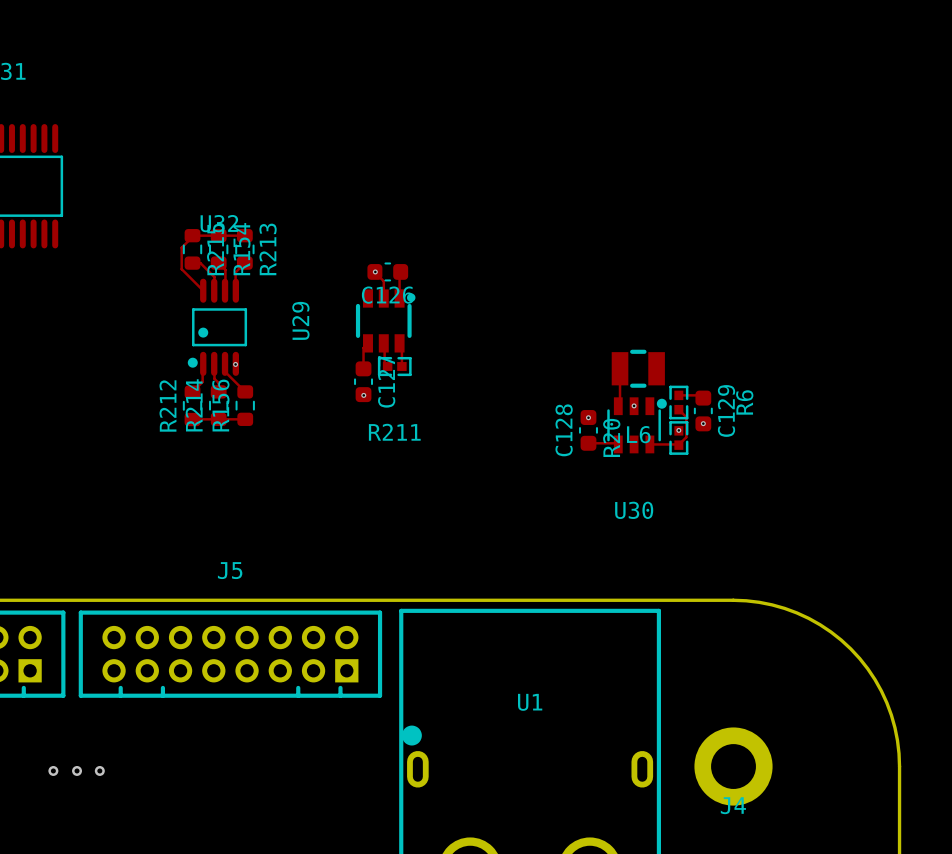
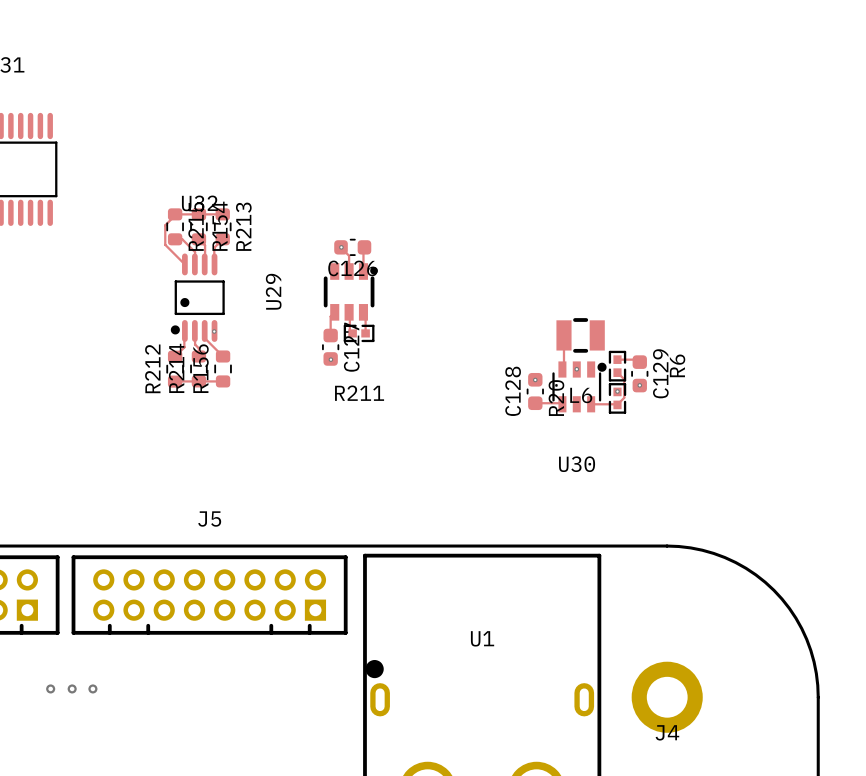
via: none -> (50, 688)
via: none -> (72, 688)
via: none -> (92, 688)
via: (53, 770) -> none
via: (77, 770) -> none
via: (99, 770) -> none

